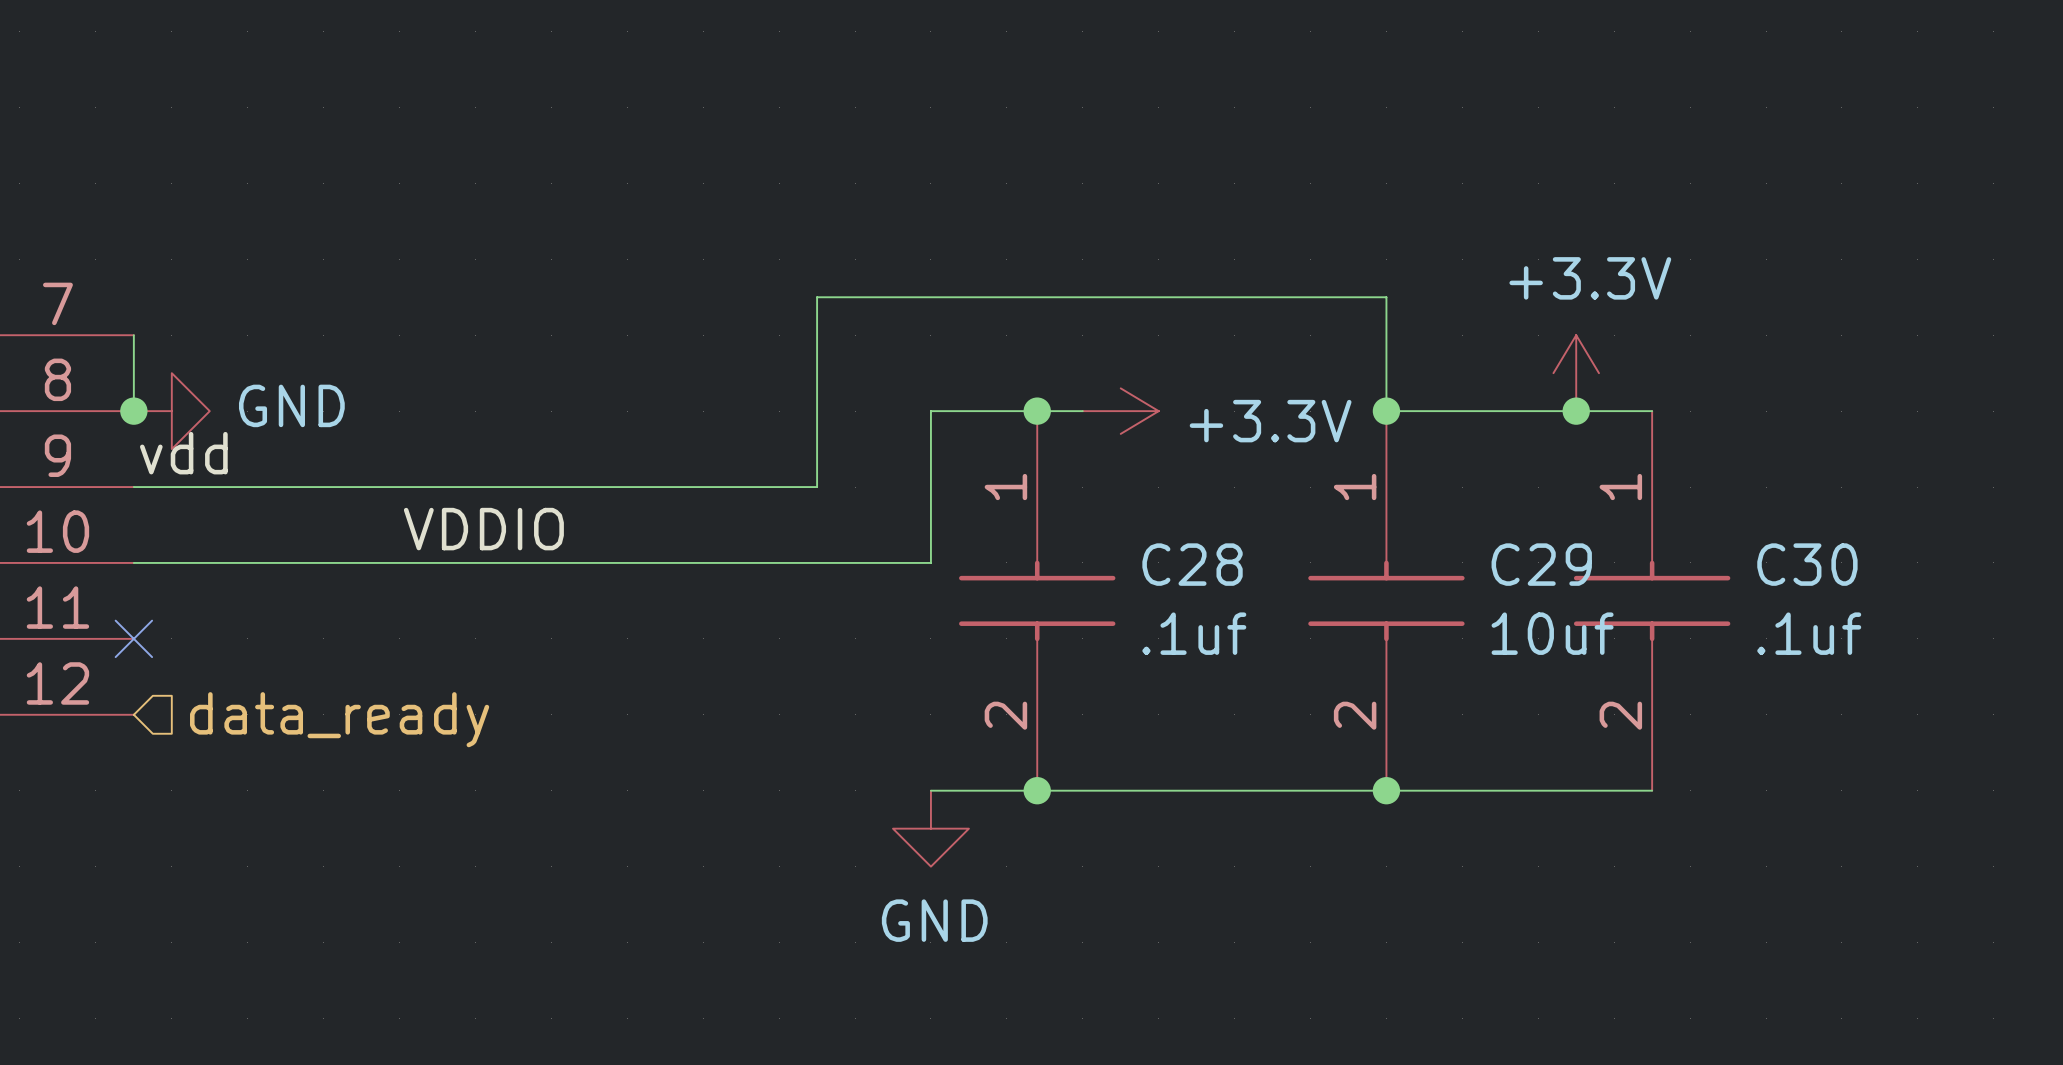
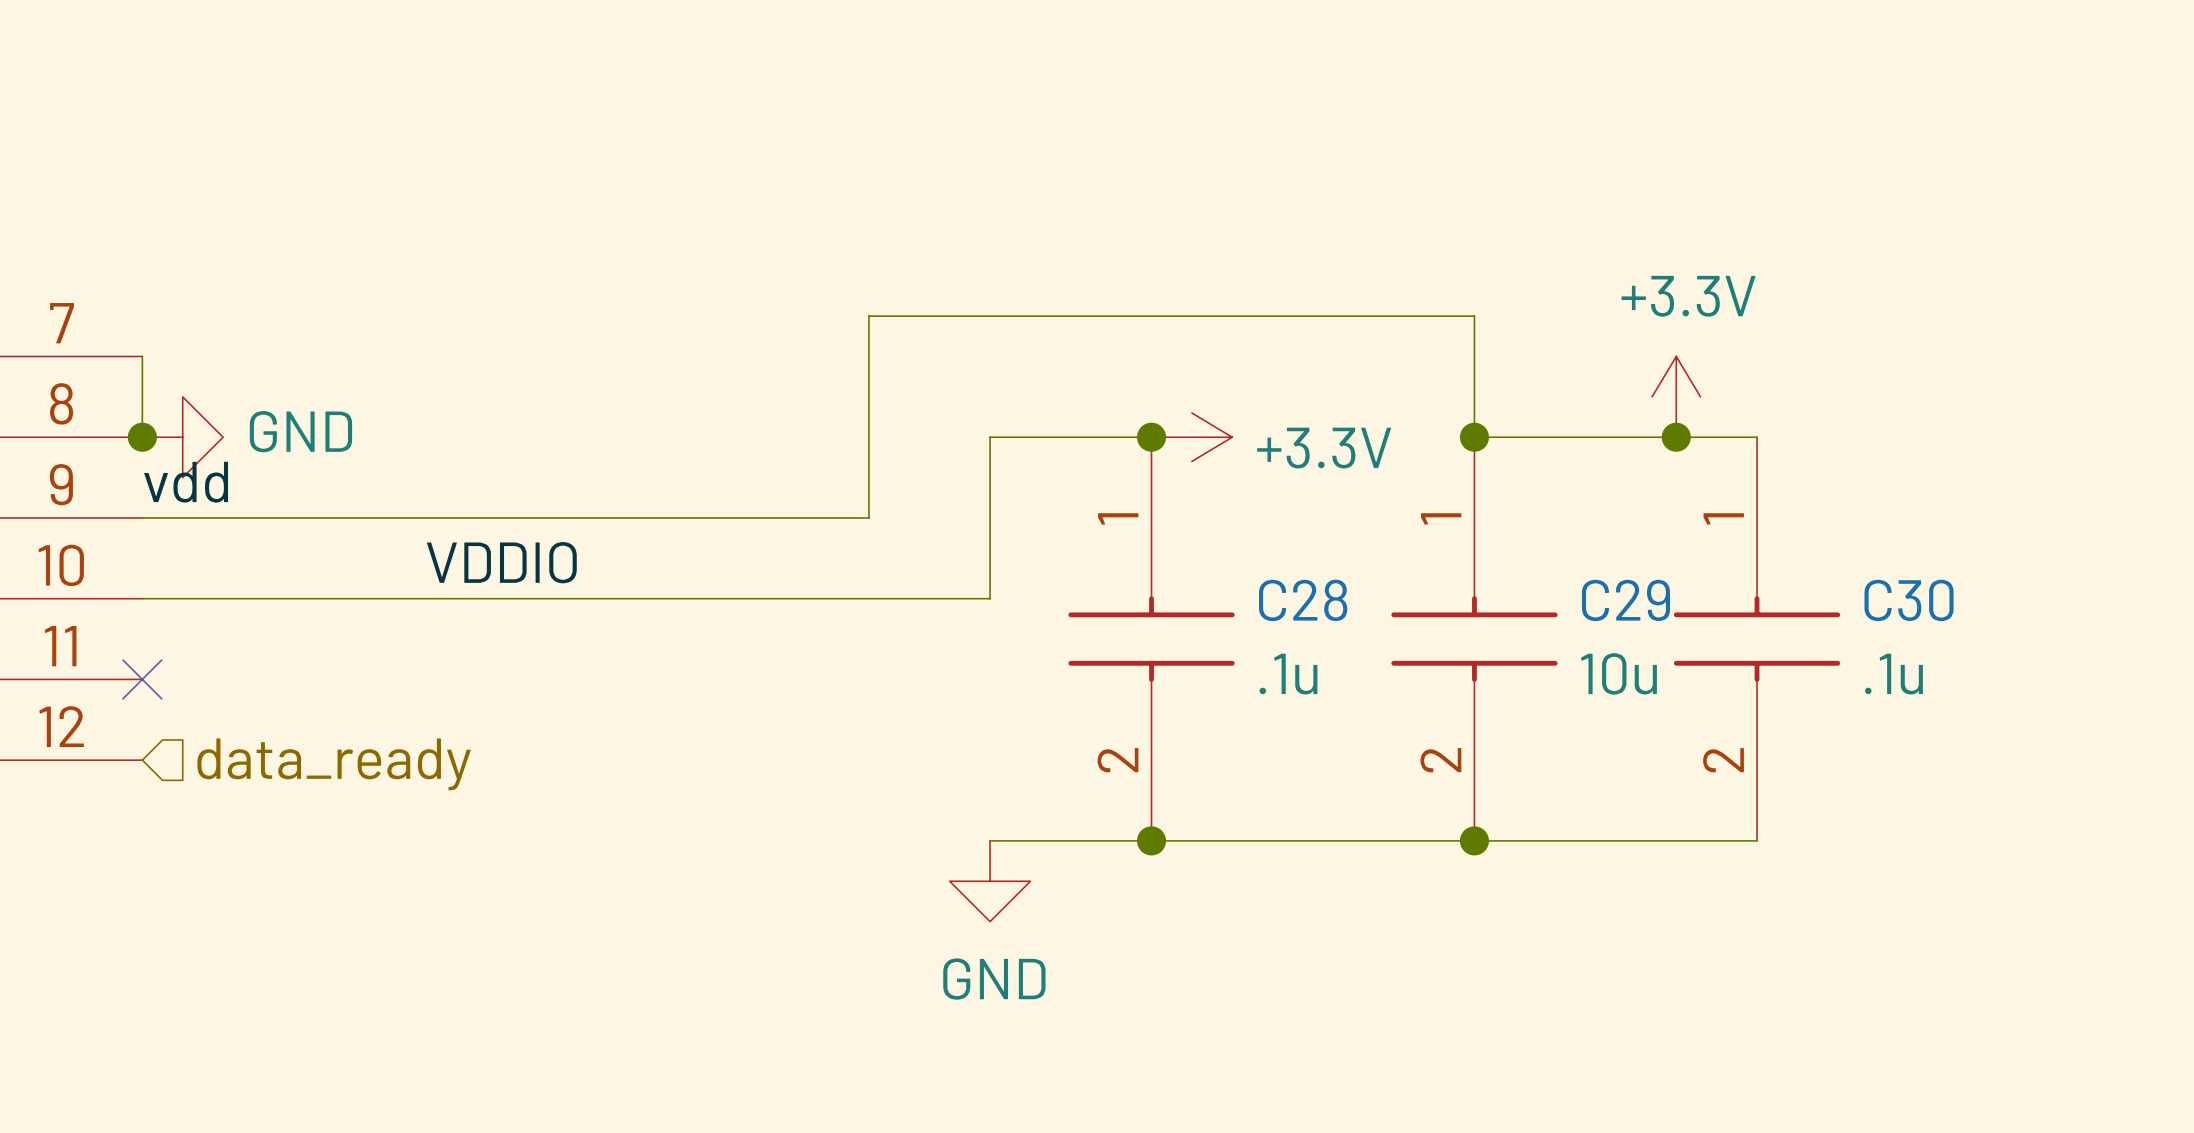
junction position: (1037, 411) -> (1151, 437)
C28 position: (1037, 600) -> (1151, 639)
C28 value: .1uf (1194, 633) -> .1u (1288, 674)
C29 value: 10uf (1552, 633) -> 10u (1619, 673)
C30 value: .1uf (1809, 633) -> .1u (1893, 674)
junction position: (1037, 790) -> (1151, 840)

